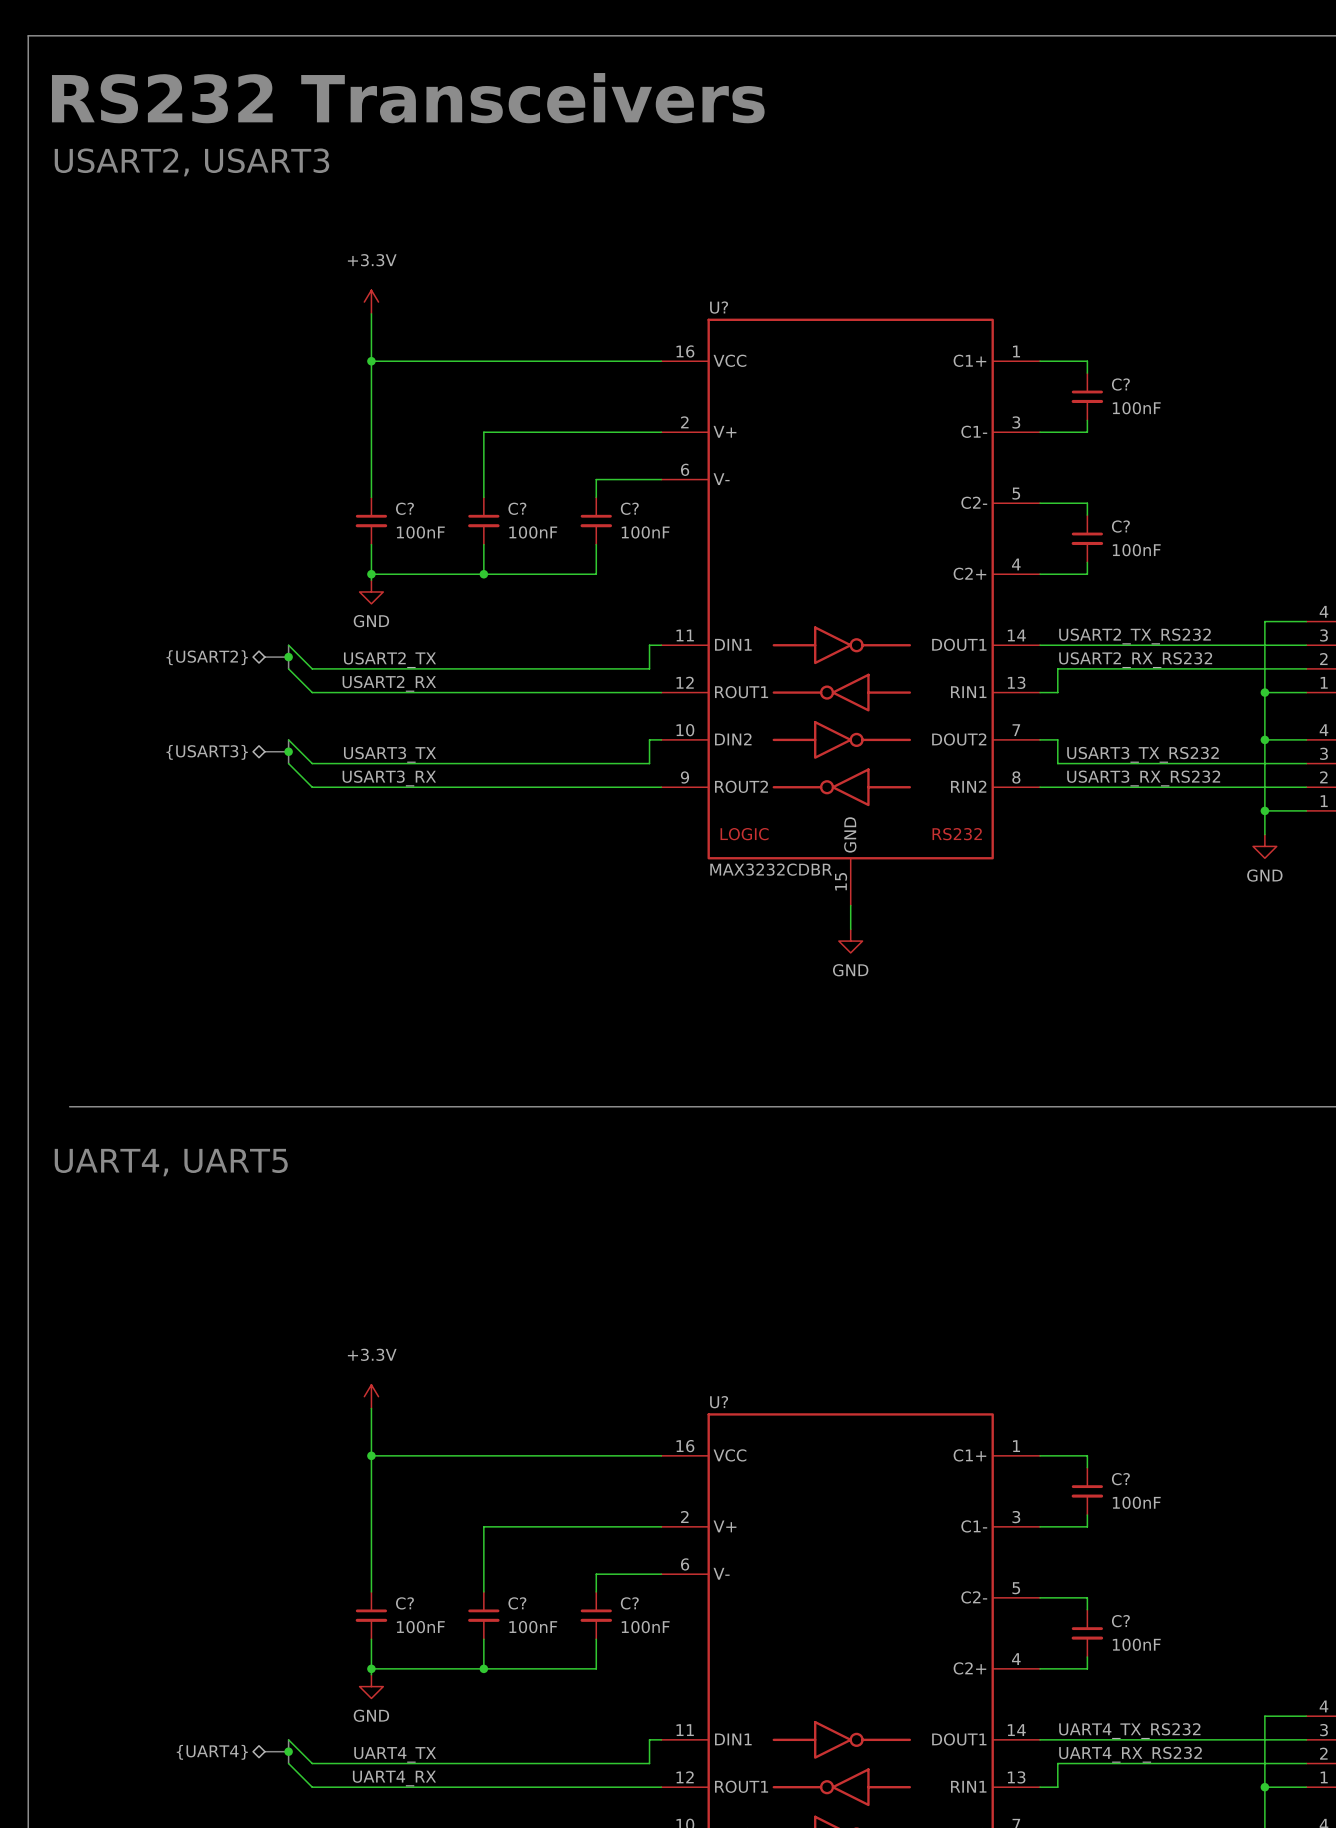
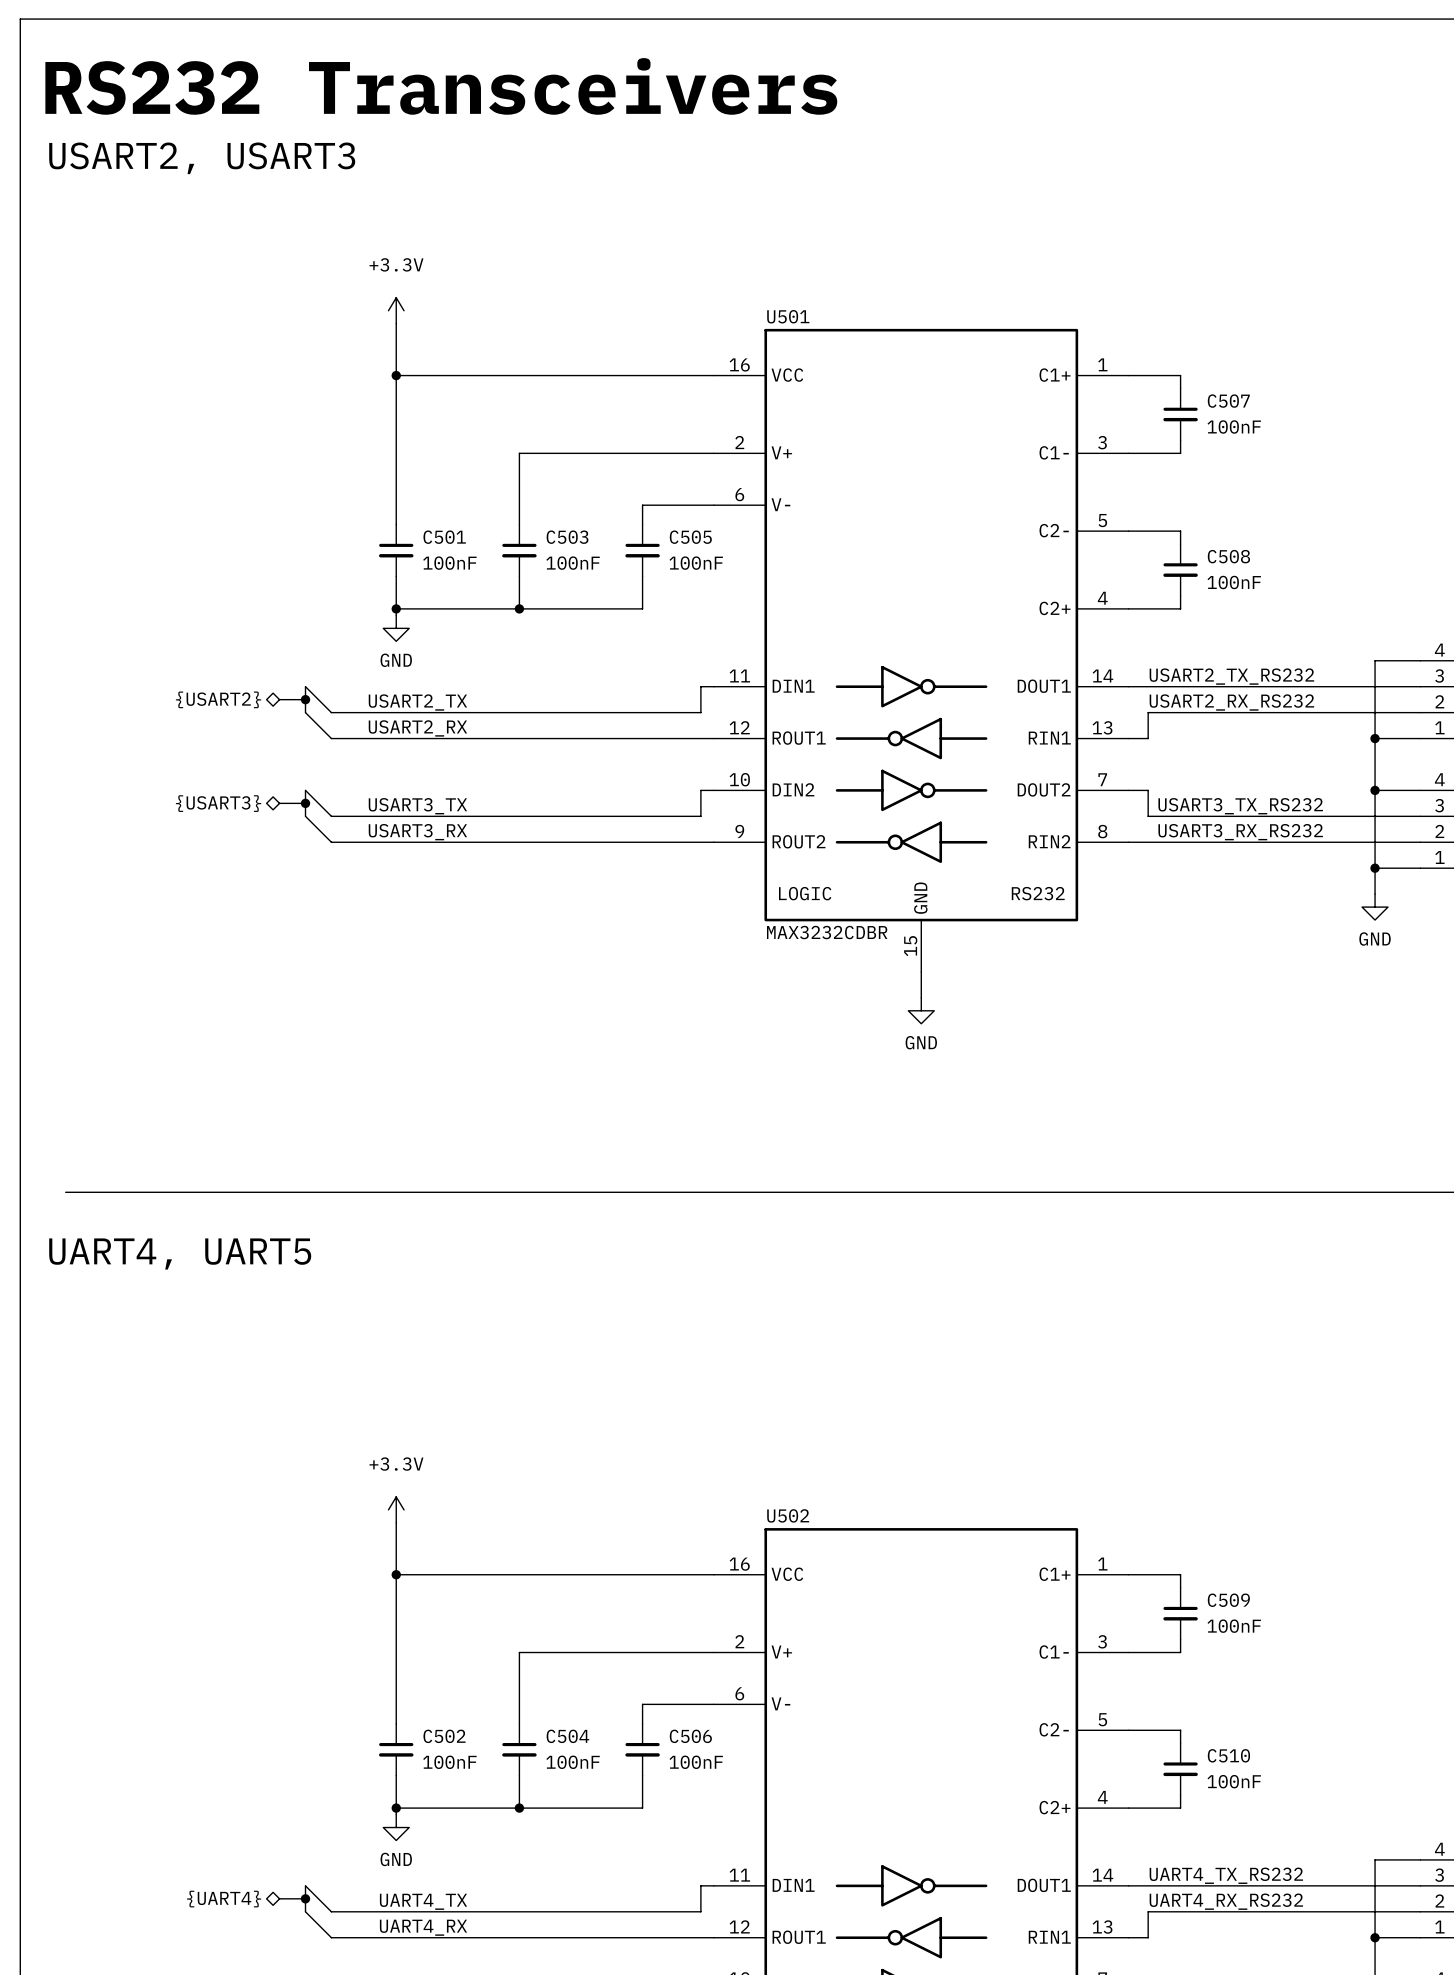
U? name: U? (719, 307) -> U501 (788, 316)
C? name: C? (1120, 384) -> C507 (1228, 401)
C? name: C? (404, 508) -> C501 (444, 537)
C? name: C? (517, 508) -> C503 (567, 537)
C? name: C? (629, 508) -> C505 (690, 537)
C? name: C? (1120, 526) -> C508 (1228, 556)
U? name: U? (719, 1402) -> U502 (788, 1515)
C? name: C? (1120, 1479) -> C509 (1228, 1600)
C? name: C? (404, 1603) -> C502 (444, 1736)
C? name: C? (517, 1603) -> C504 (567, 1736)
C? name: C? (629, 1603) -> C506 (690, 1736)
C? name: C? (1120, 1621) -> C510 (1228, 1755)

